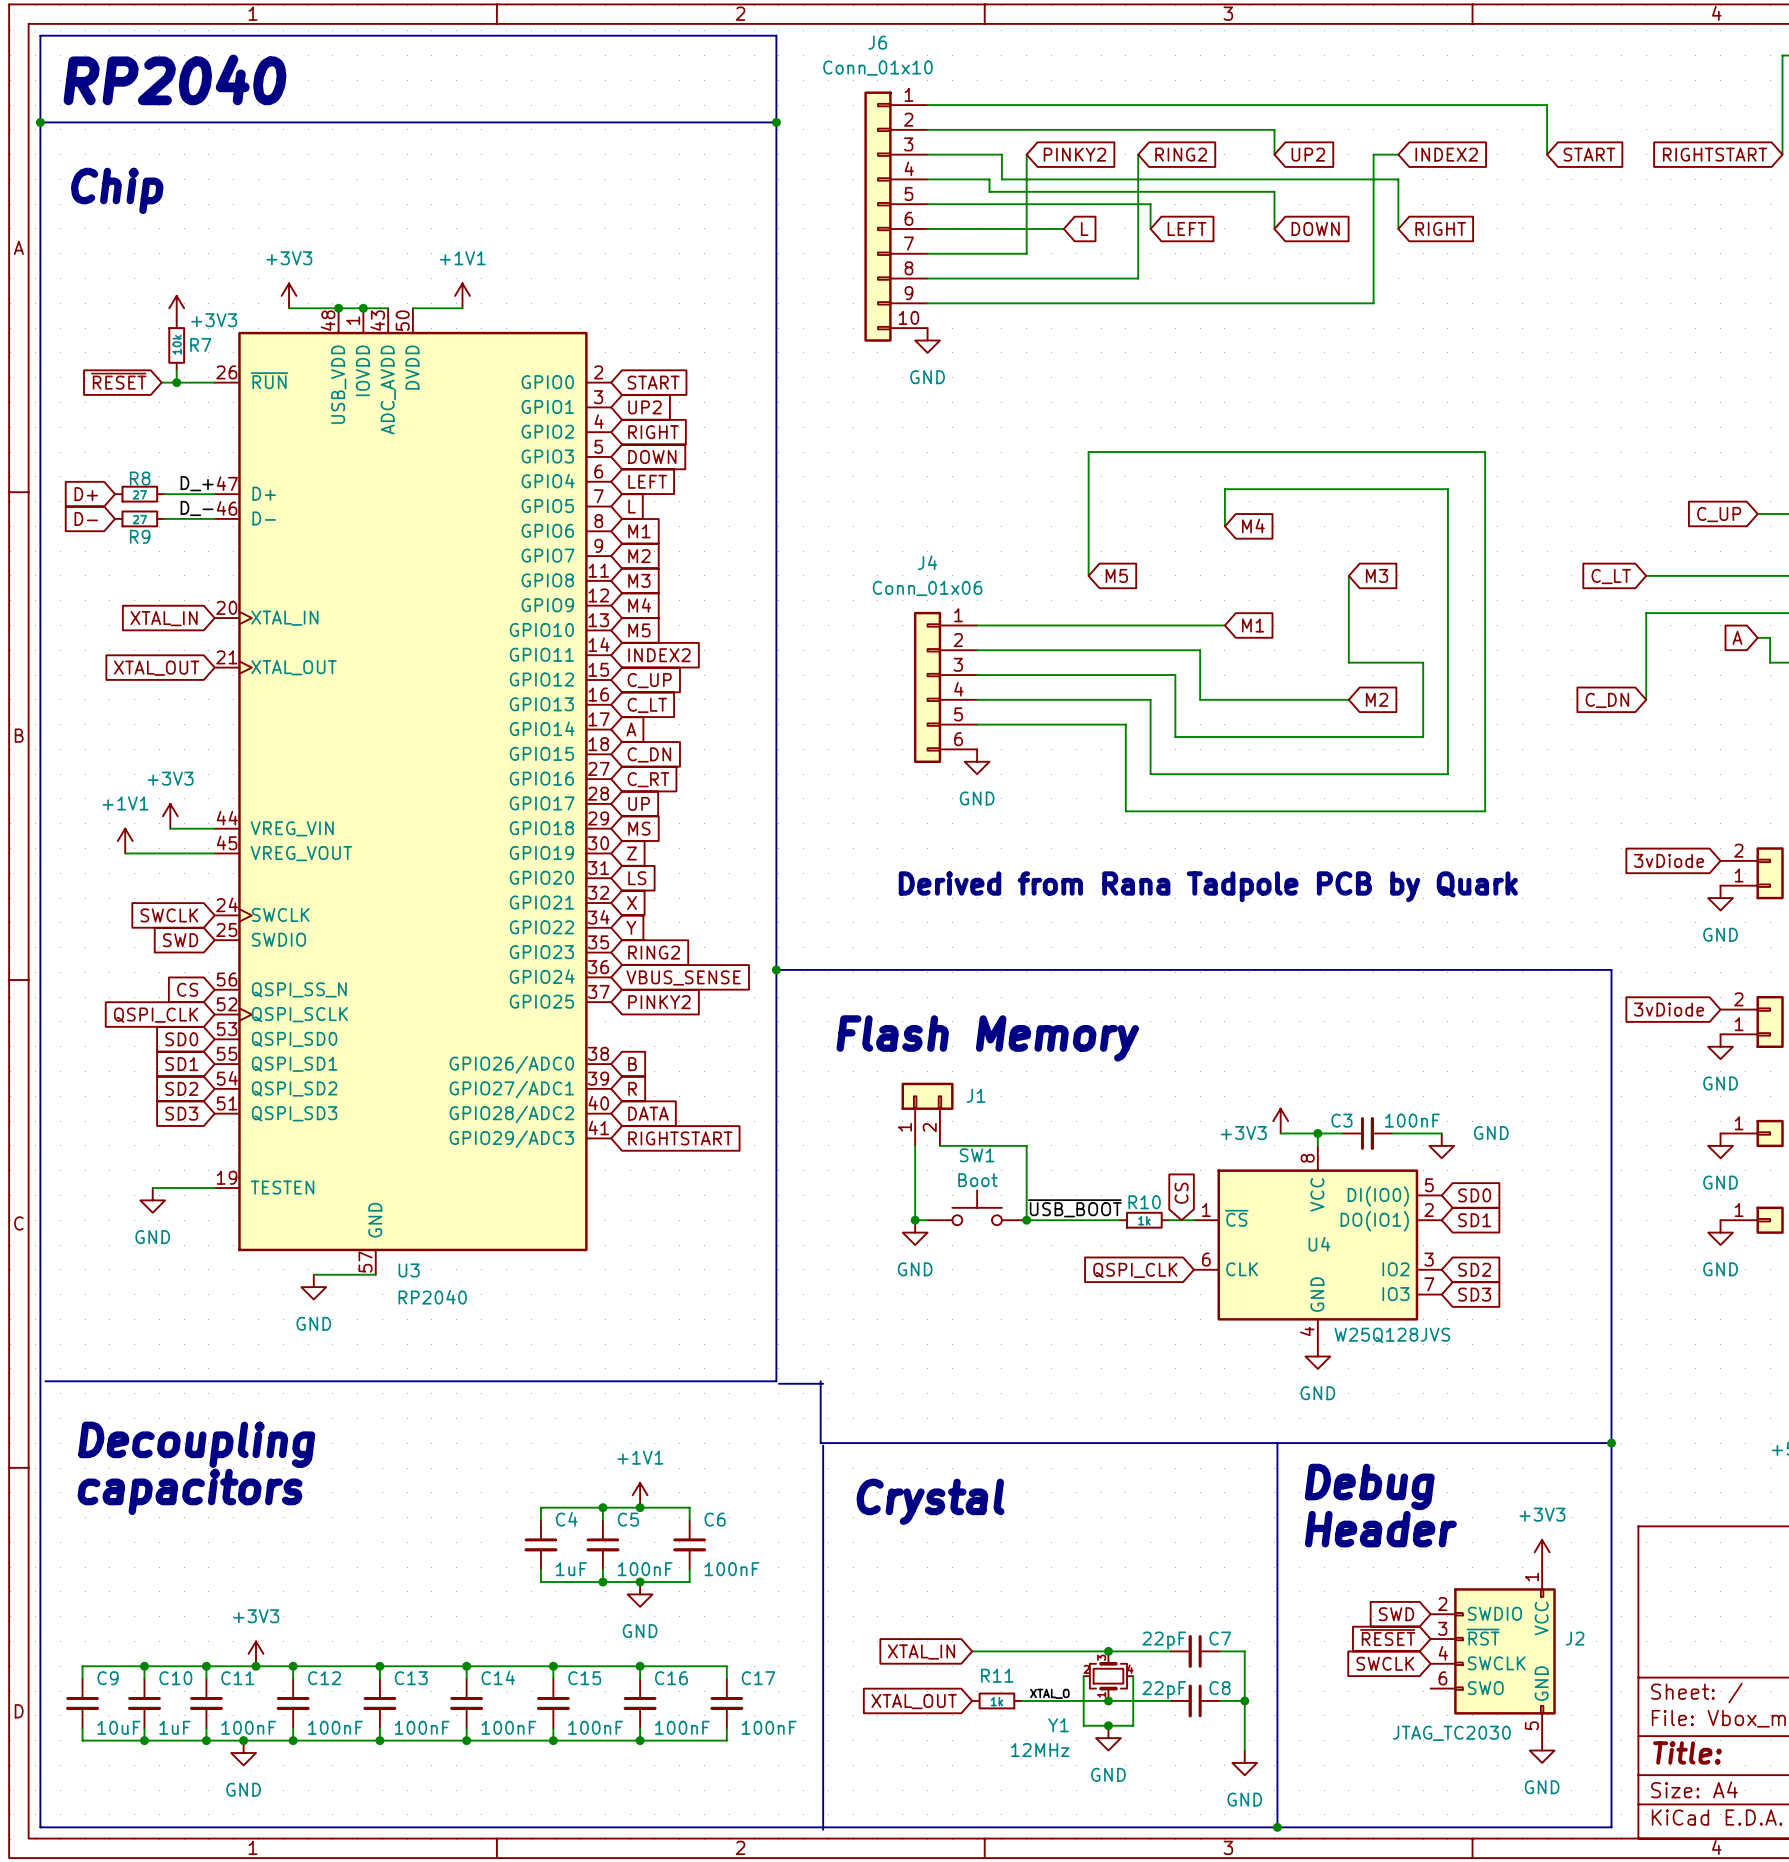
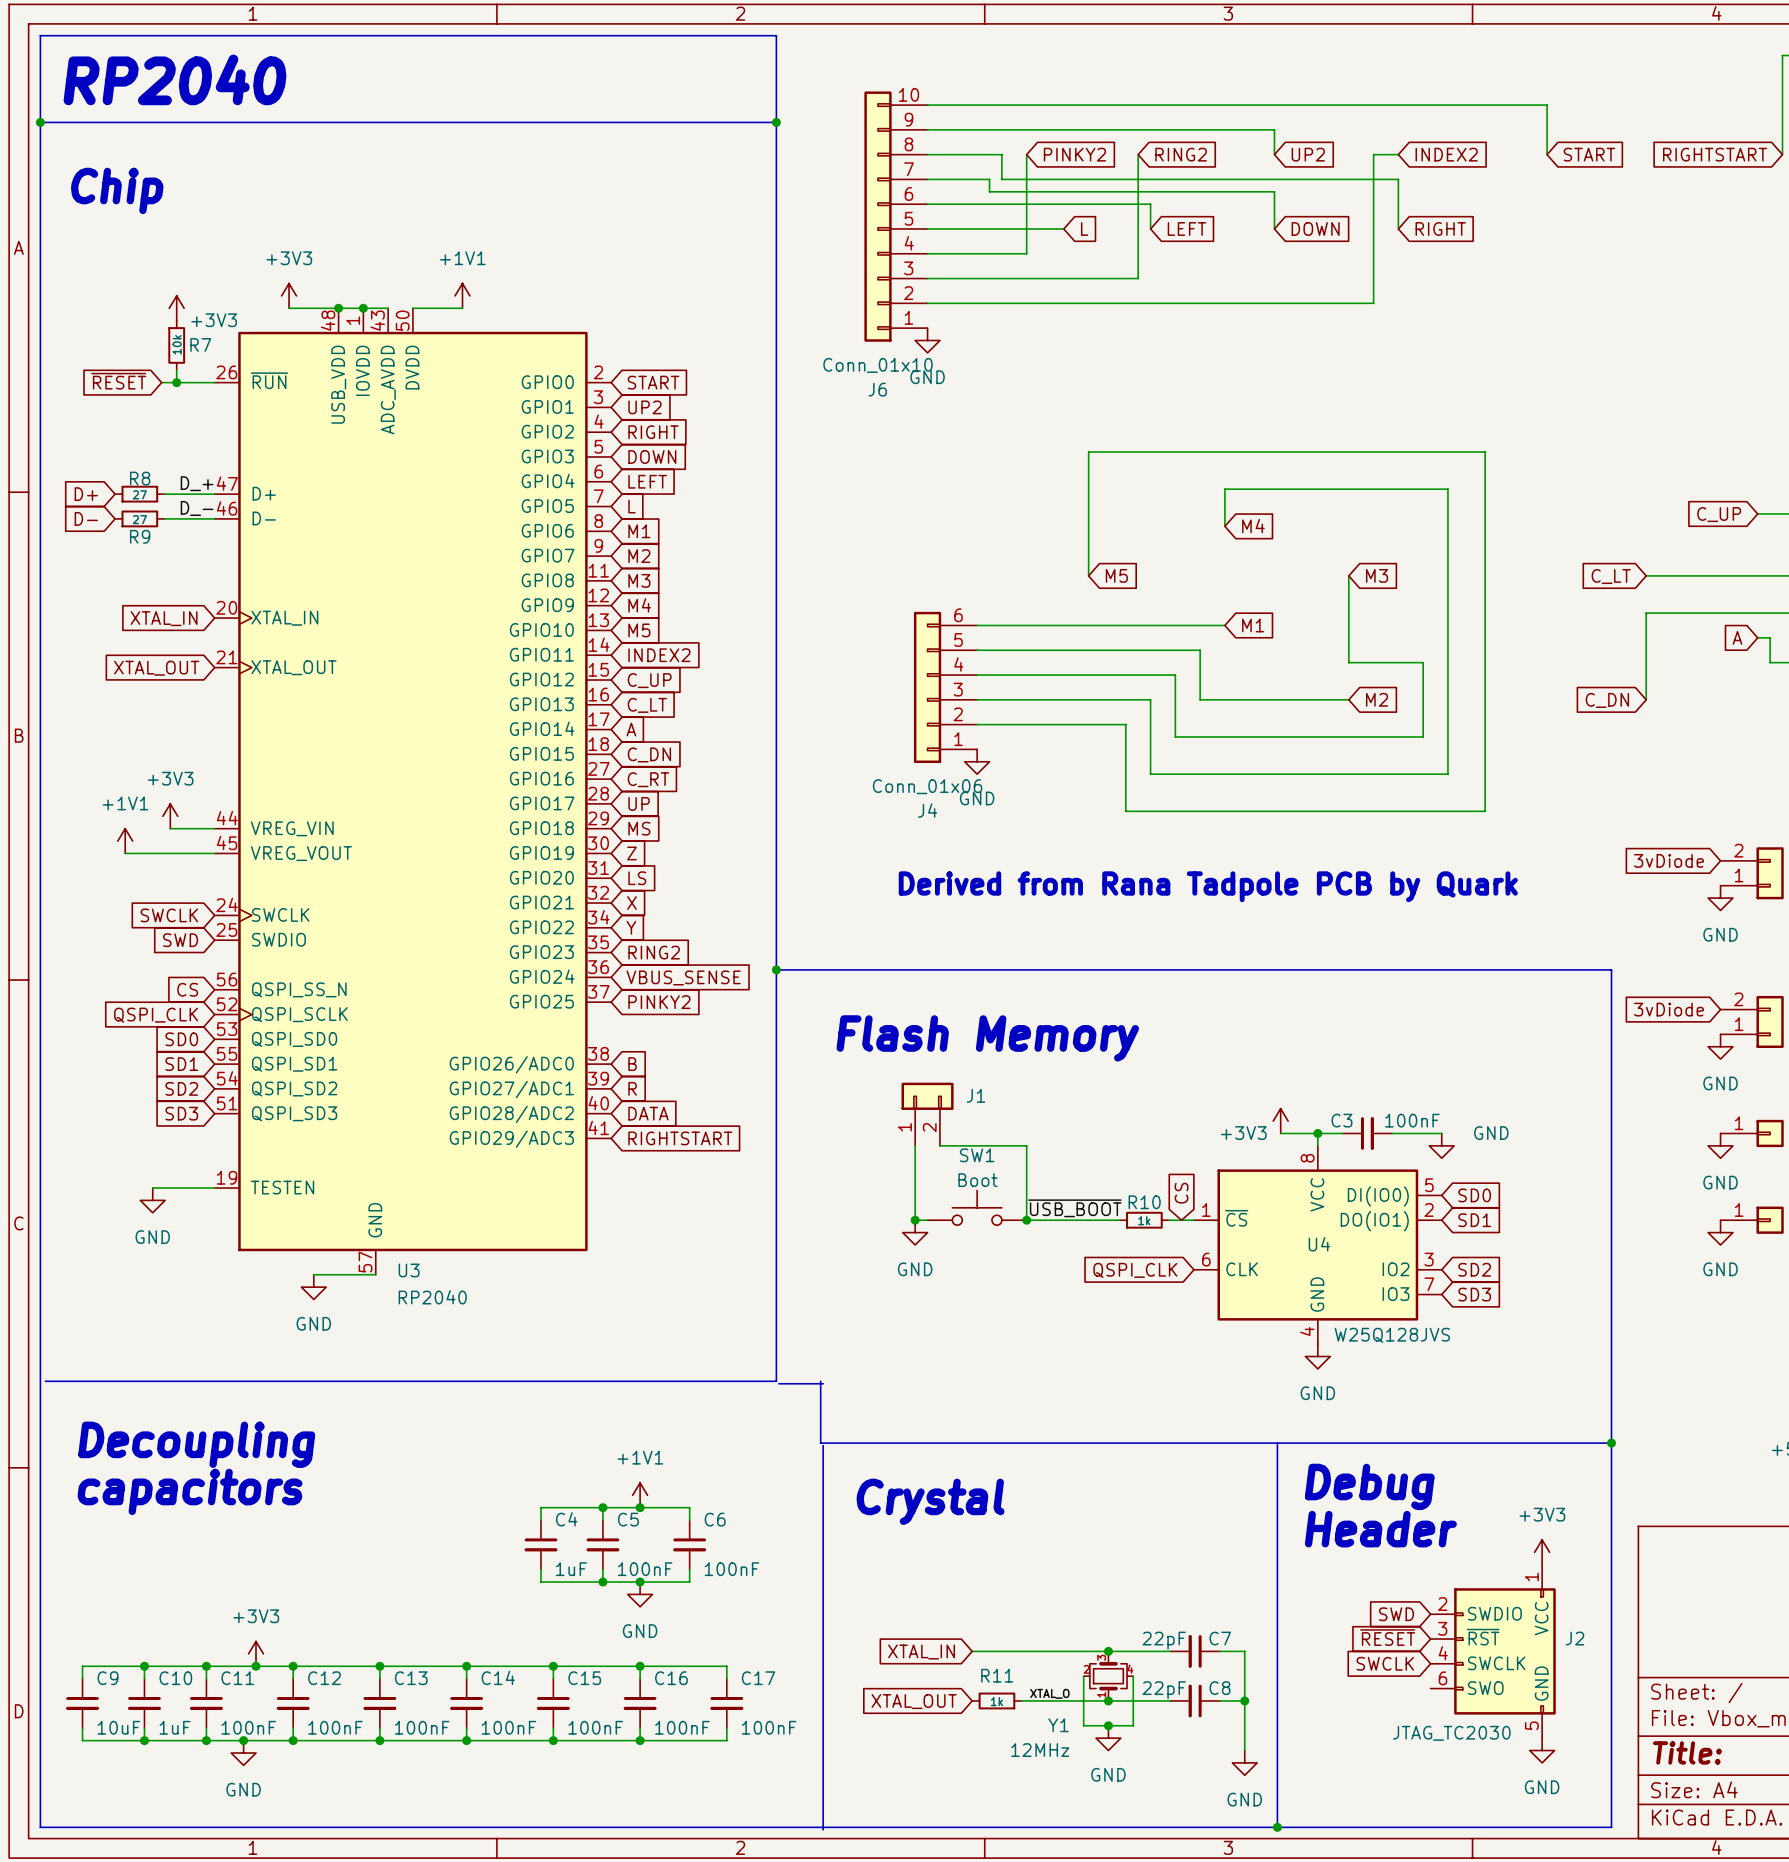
J6 flip: as is (877, 216) -> up-down (877, 216)
J4 flip: as is (927, 687) -> up-down (927, 687)

